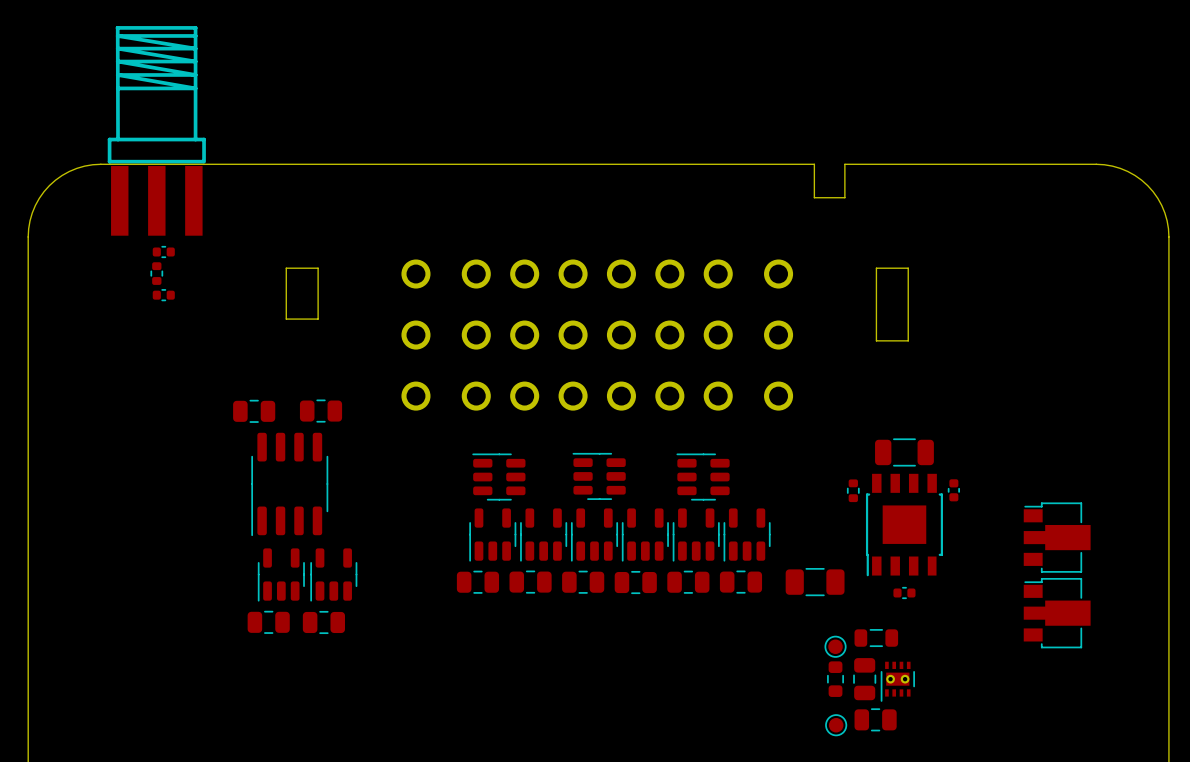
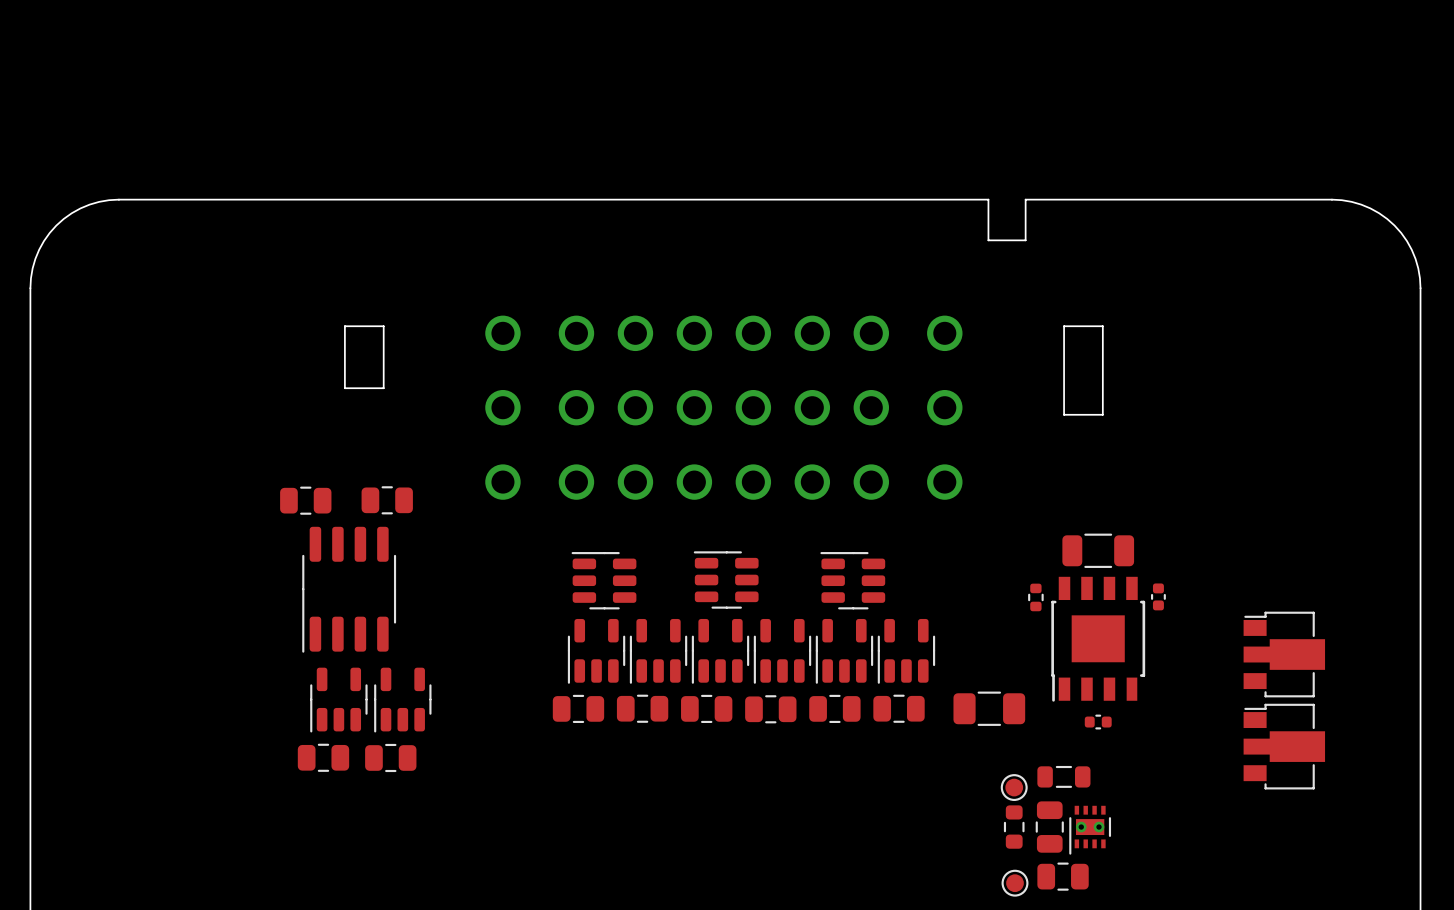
part: (156, 130) -> none
part: (163, 252) -> none
part: (156, 273) -> none
part: (163, 295) -> none

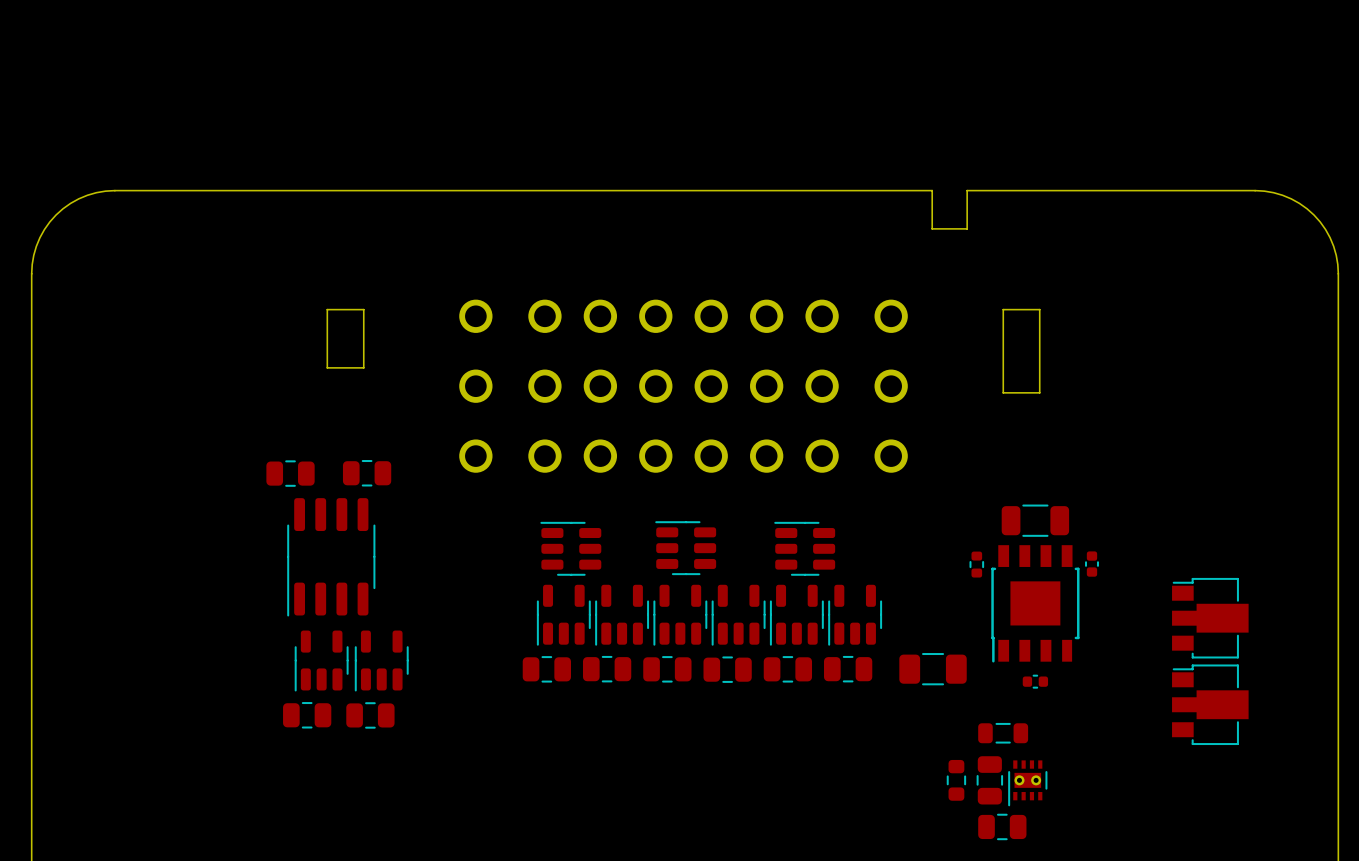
part: (1014, 787) -> none
part: (1015, 883) -> none

